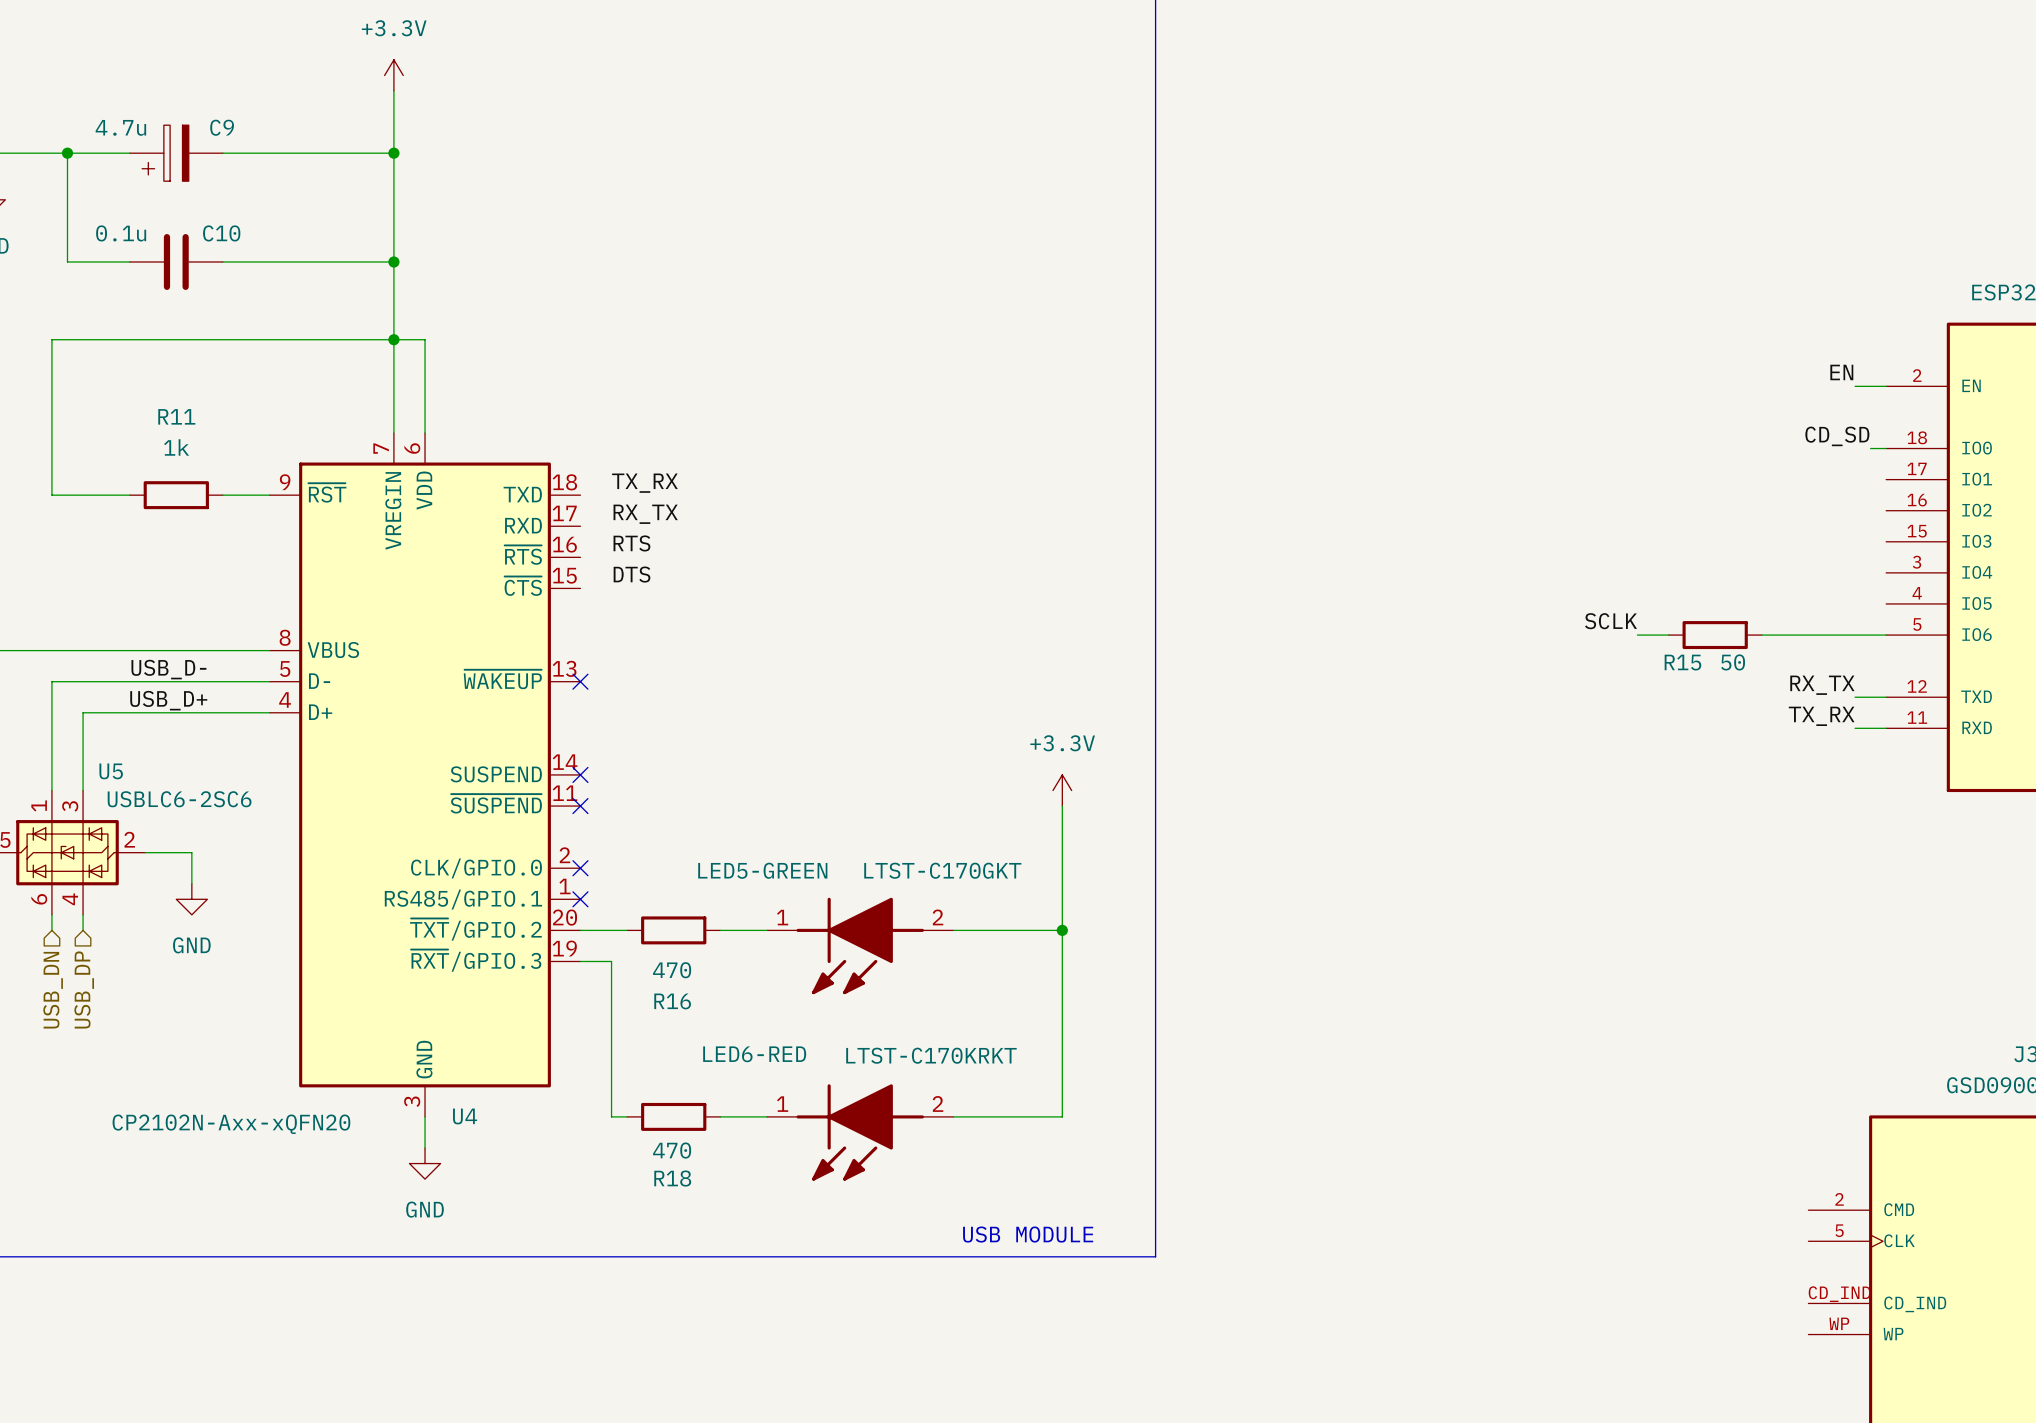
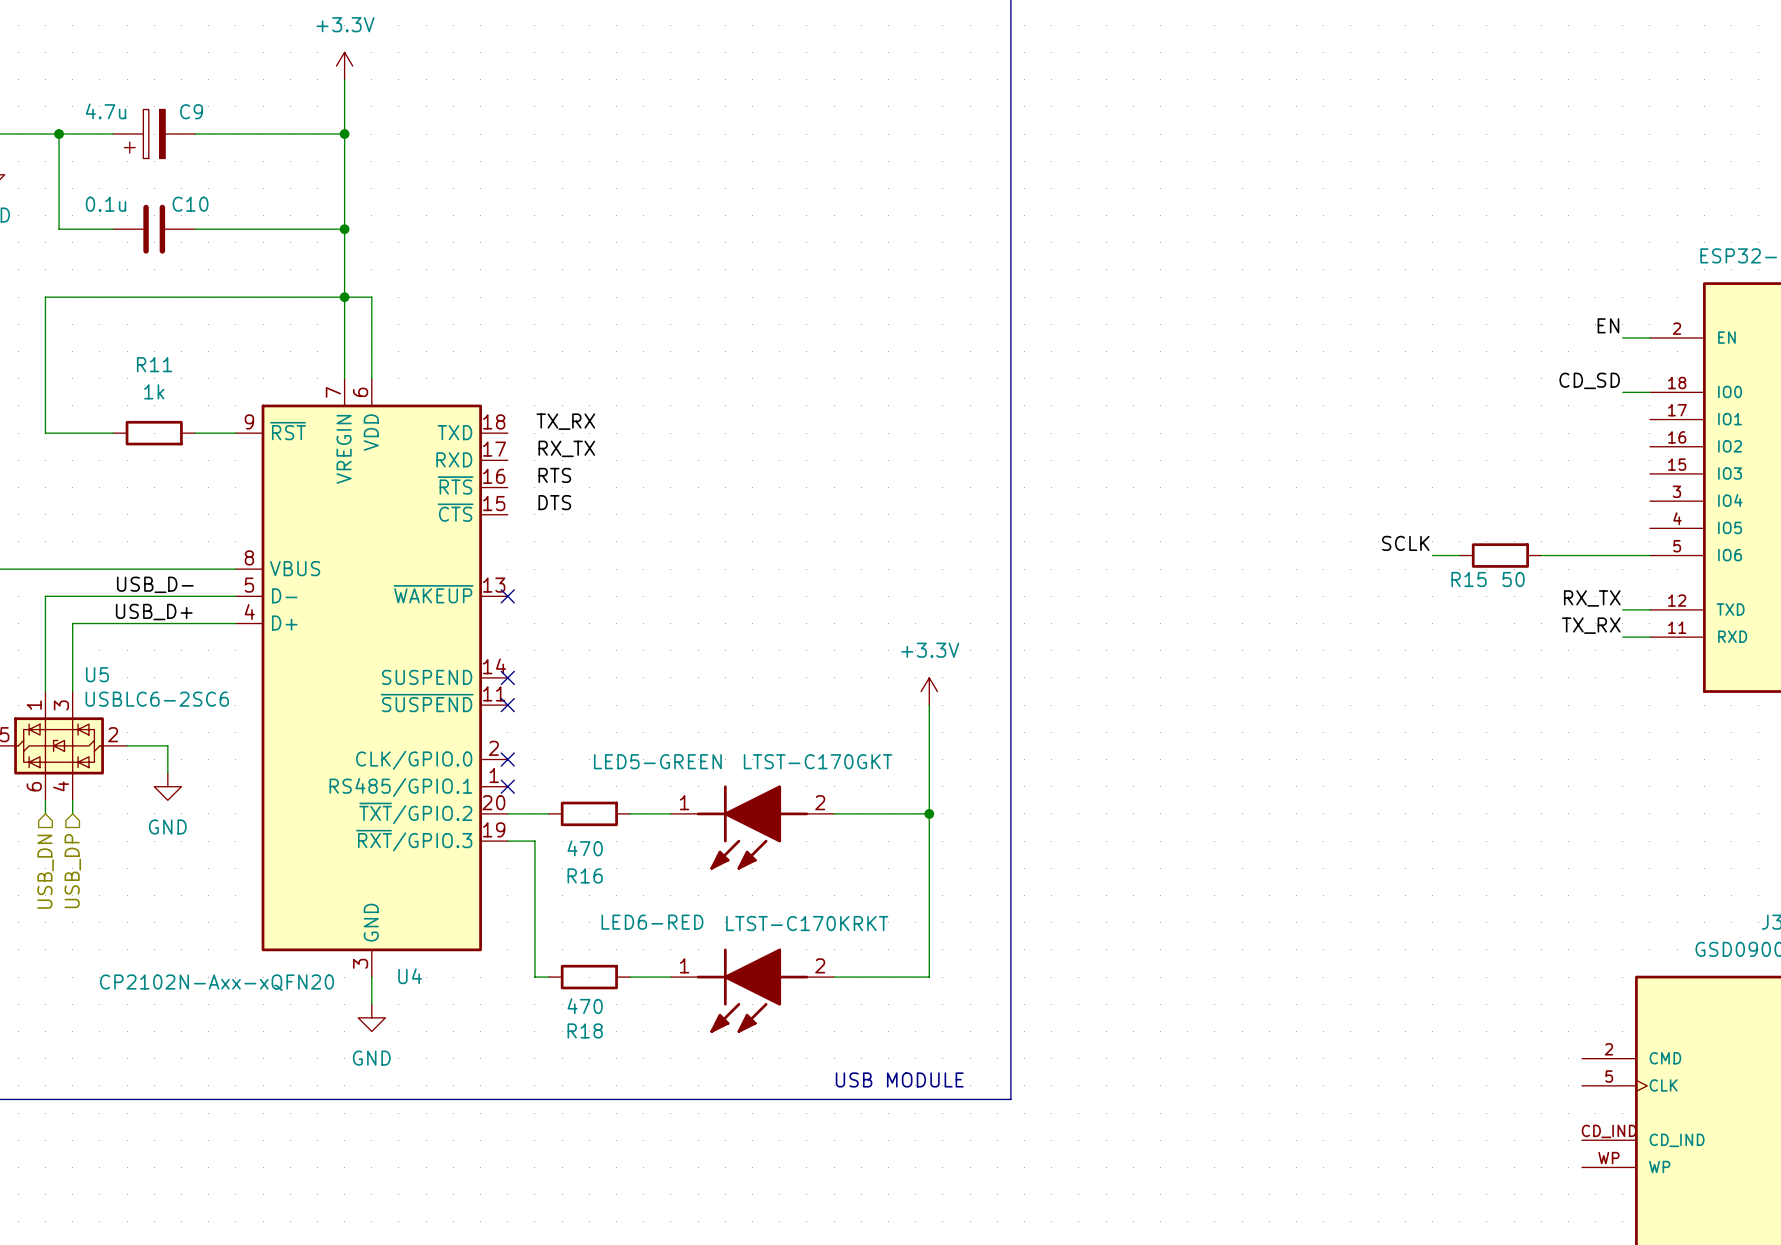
label position: CD_SD (1837, 436) -> CD_SD (1589, 380)
wire: none -> (1622, 392) (1636, 392)

